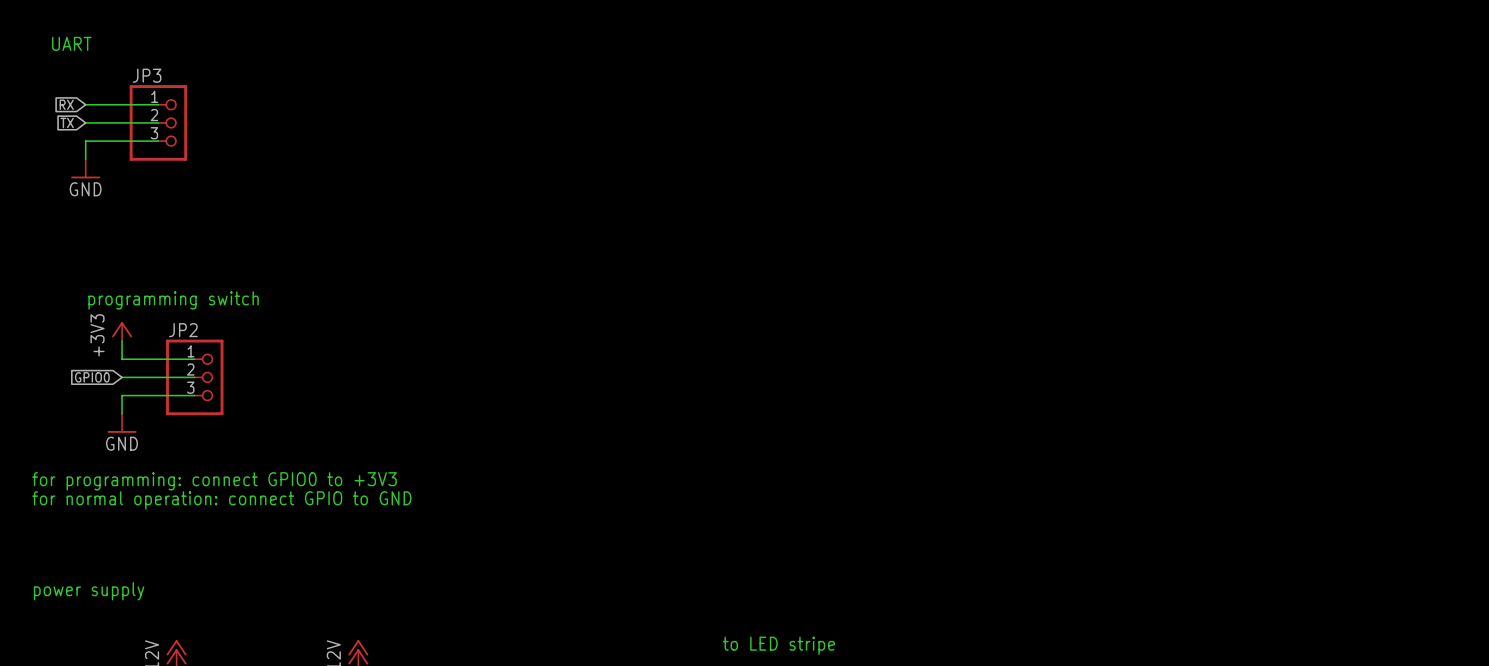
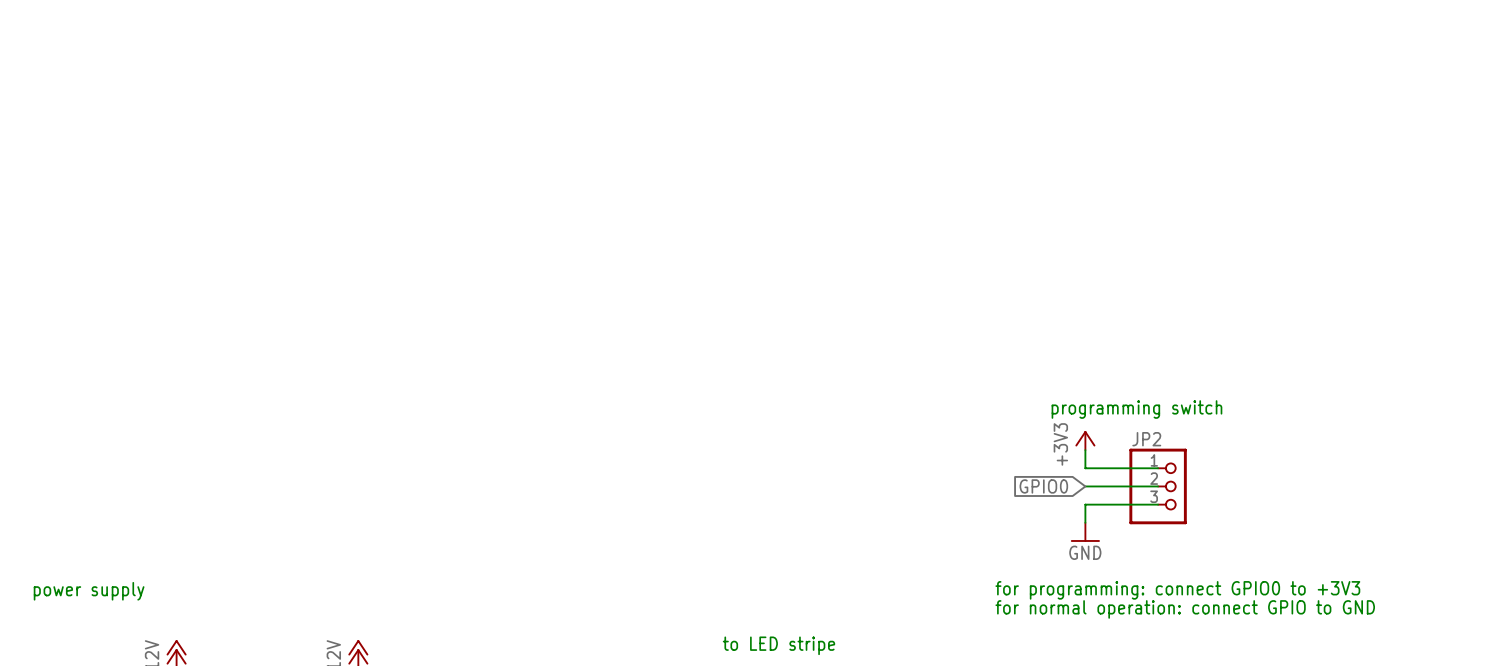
text: UART (71, 43) -> none
global label: RX (66, 104) -> none
wire: (85, 104) (158, 104) -> none
global label: TX (67, 122) -> none
wire: (85, 122) (158, 122) -> none
JP3: (158, 122) -> none
wire: (158, 141) (85, 141) (85, 159) -> none
power symbol: GND (85, 168) -> none
text: programming switch (173, 300) -> none
power symbol: +3V3 (122, 331) -> none
wire: (122, 341) (122, 359) (194, 359) -> none
global label: GPIO0 (92, 377) -> none
wire: (122, 377) (194, 377) -> none
JP2 position: (194, 377) -> (1158, 486)
wire: (194, 395) (122, 395) (122, 413) -> none
text: none -> programming switch (1136, 409)
power symbol: GND (122, 423) -> none
power symbol: none -> +3V3 (1085, 440)
wire: none -> (1085, 450) (1085, 468) (1158, 468)
text: for programming: connect GPIO0 to +3V3 (214, 481) -> none
global label: none -> GPIO0 (1043, 486)
wire: none -> (1085, 486) (1158, 486)
text: for normal operation: connect GPIO to GND (221, 500) -> none
wire: none -> (1158, 504) (1085, 504) (1085, 522)
power symbol: none -> GND (1085, 532)
text: none -> for programming: connect GPIO0 to +3V3 (1177, 590)
text: none -> for normal operation: connect GPIO to GND (1185, 609)

